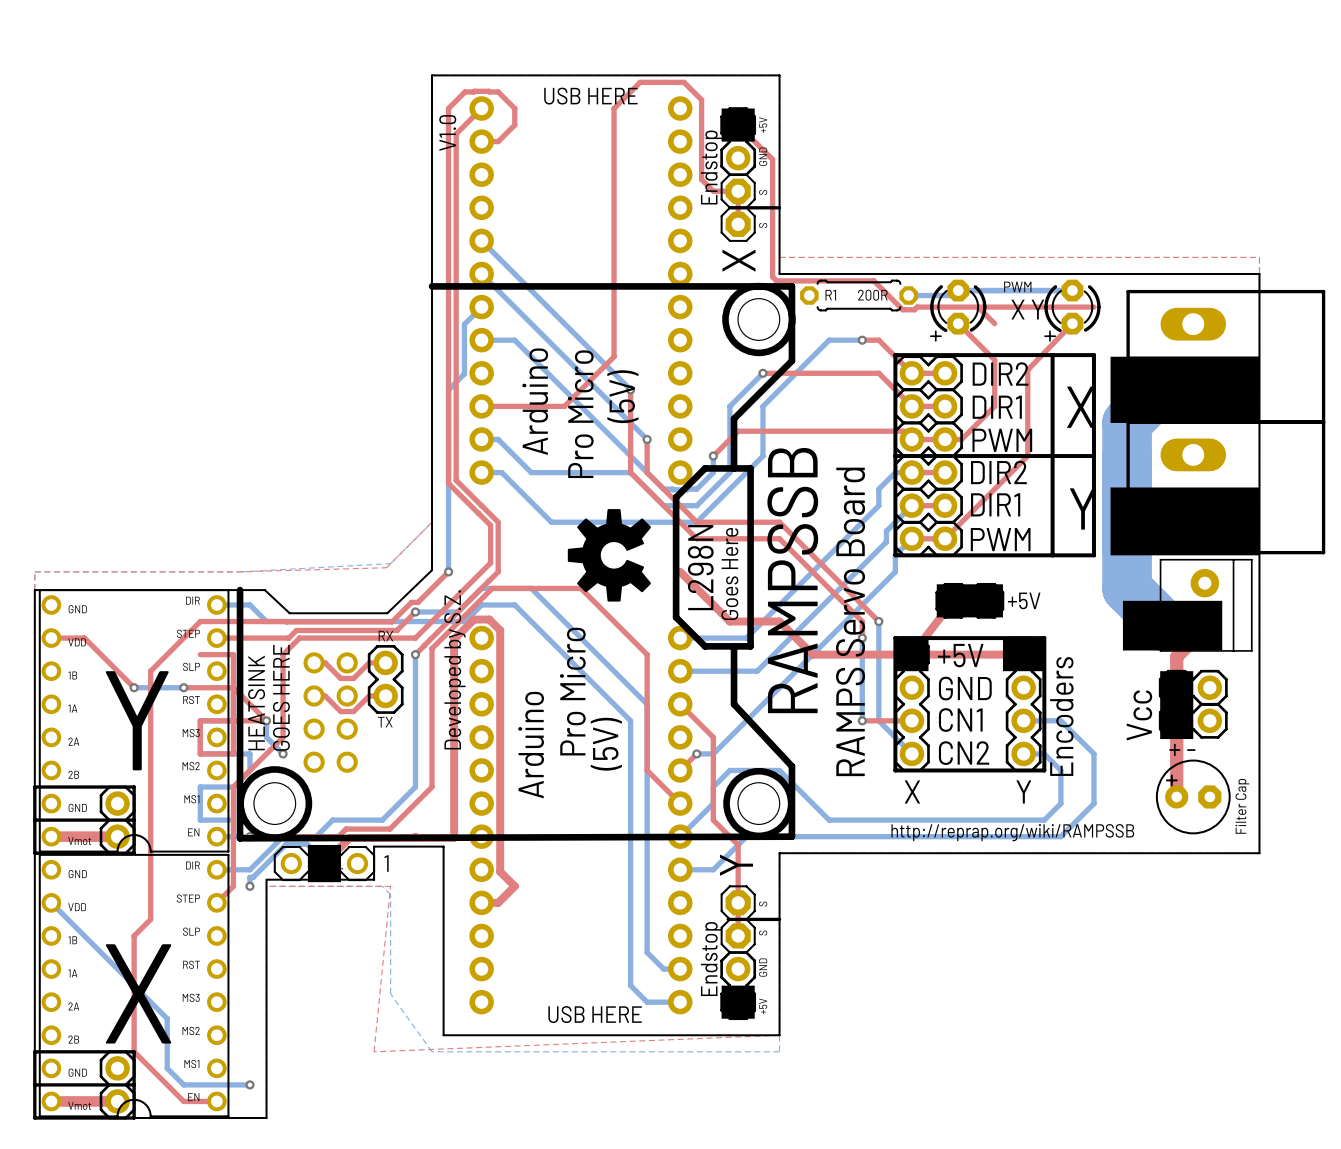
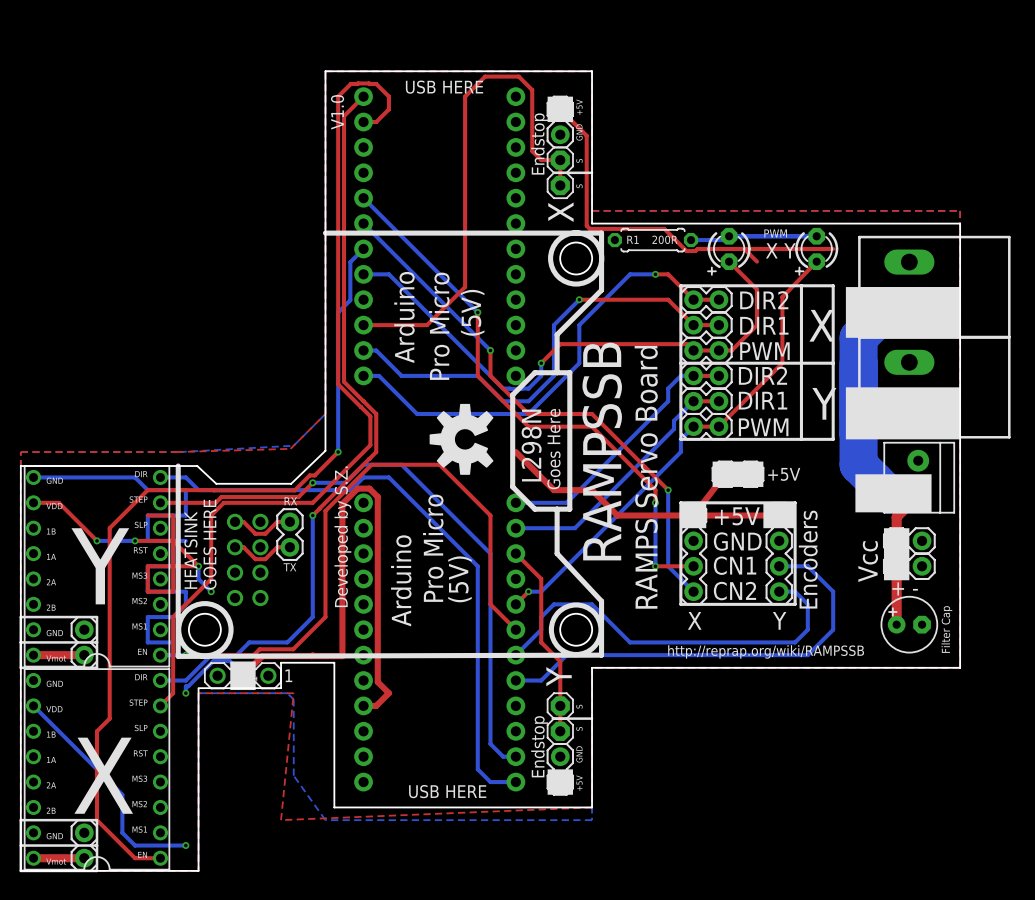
bottom track: none -> (33, 477) (135, 477) (147, 490) (185, 490) (185, 515) (147, 515) (147, 540) (185, 540)

